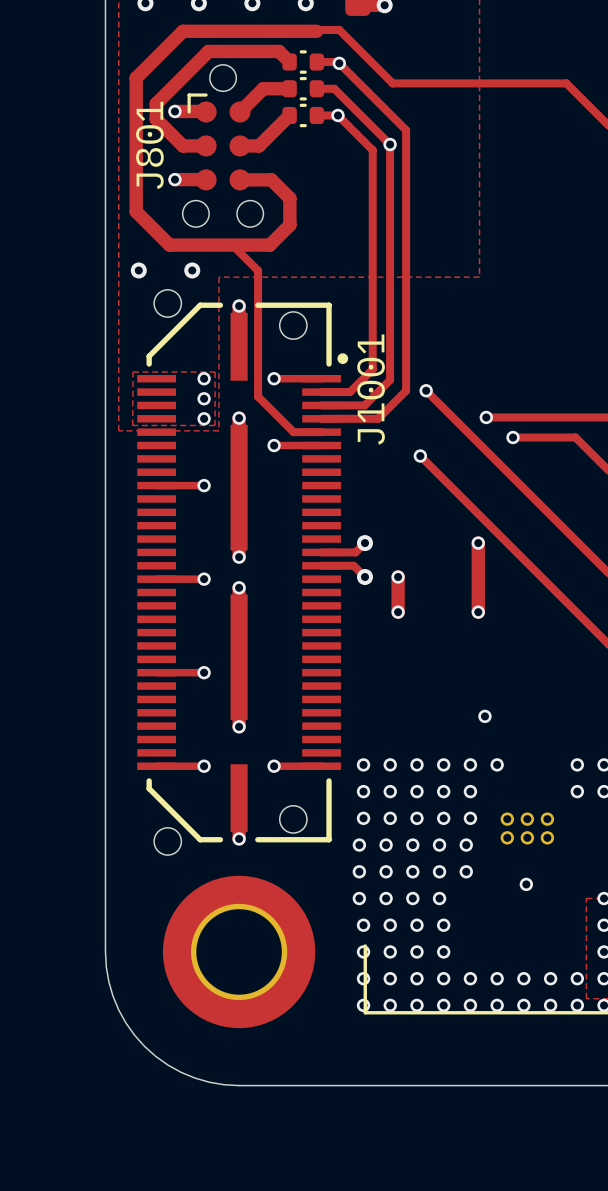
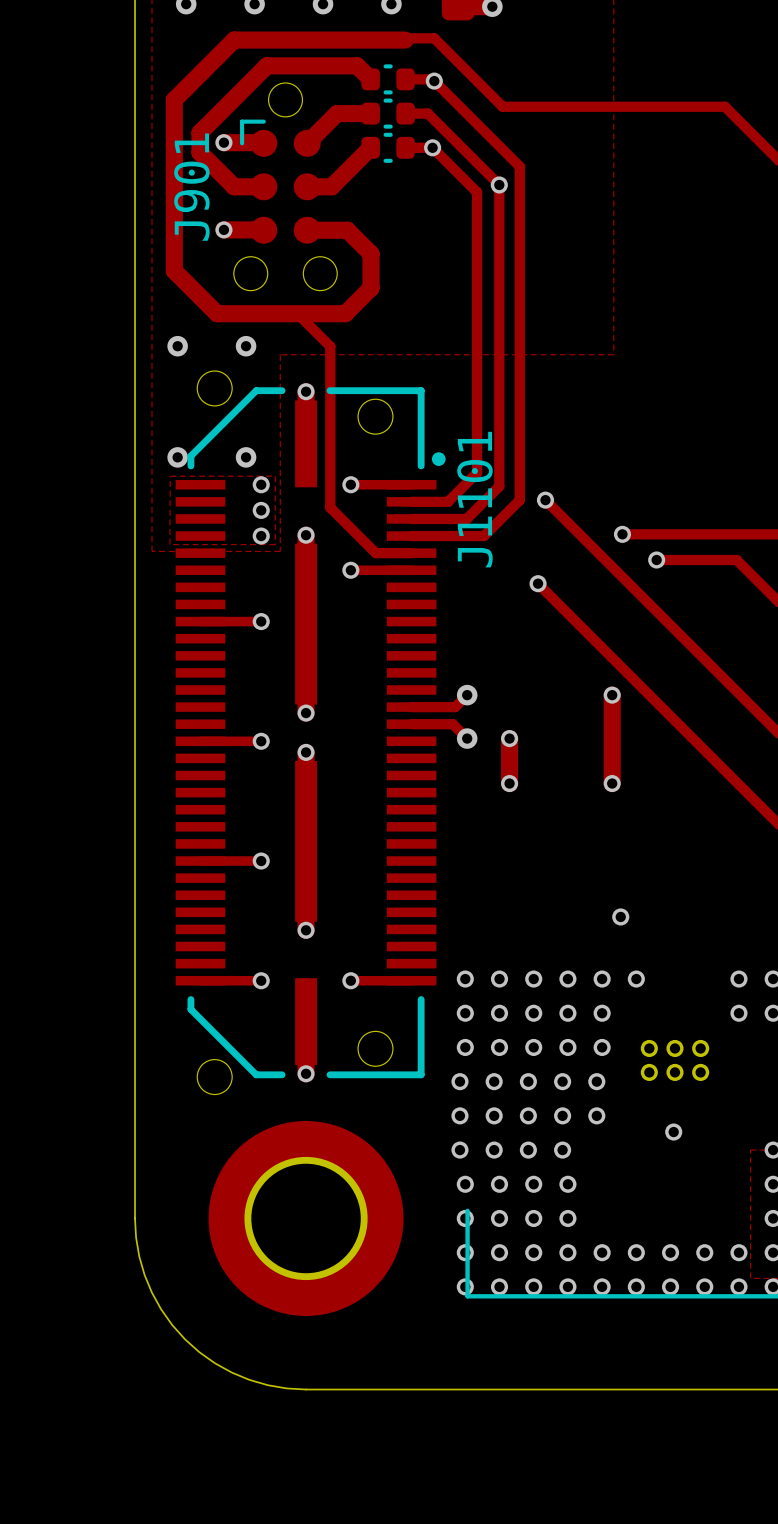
J801 name: J801 (149, 145) -> J901 (191, 187)
via: none -> (177, 457)
via: none -> (246, 457)
J1001 name: J1001 (371, 389) -> J1101 (474, 499)

